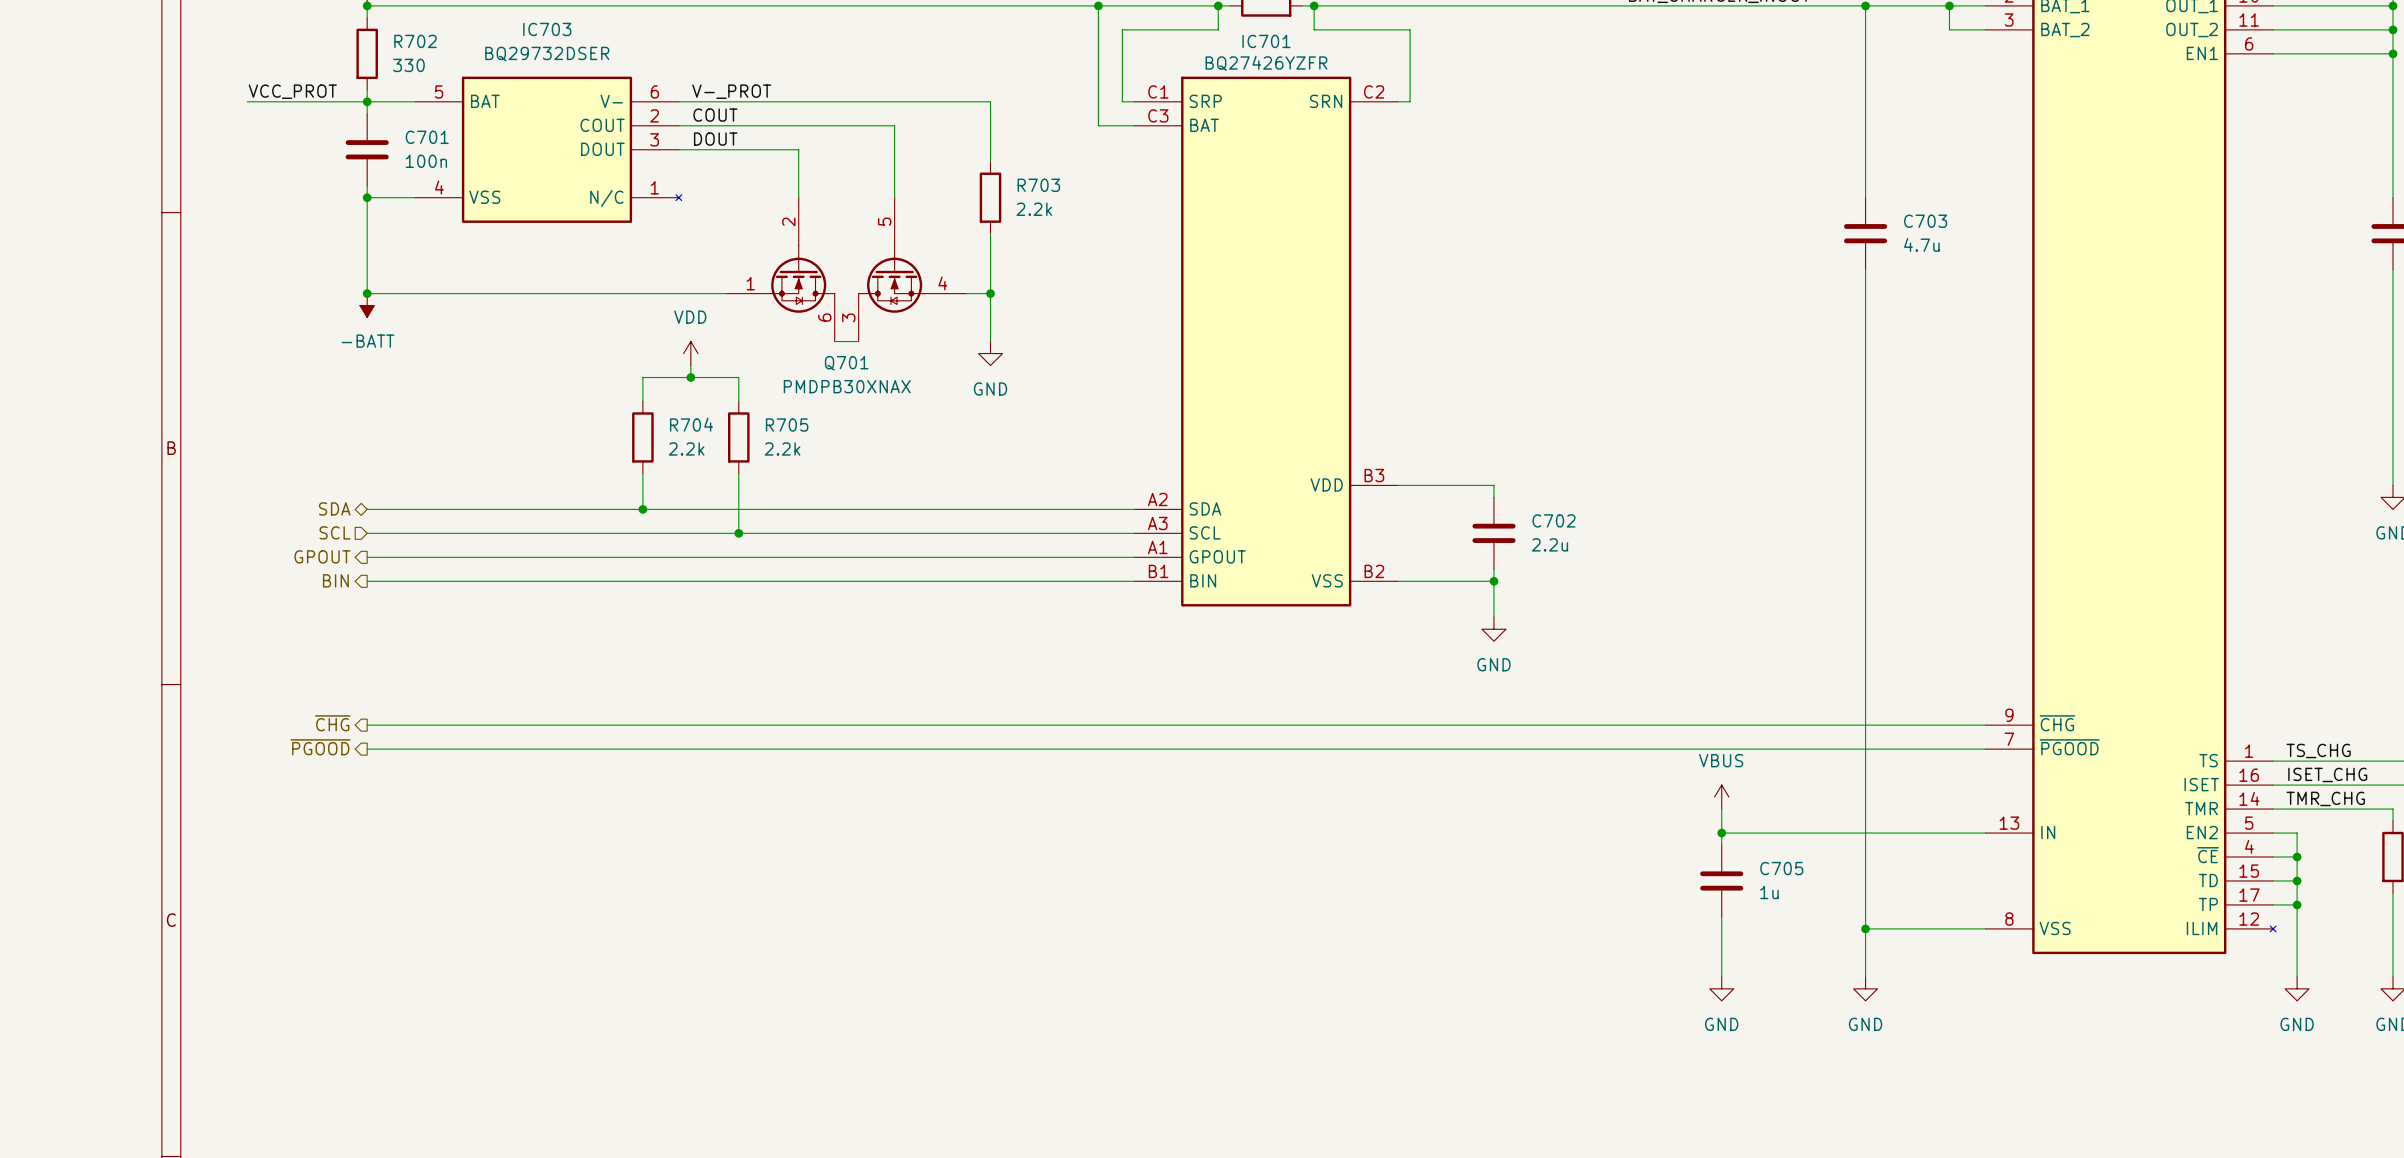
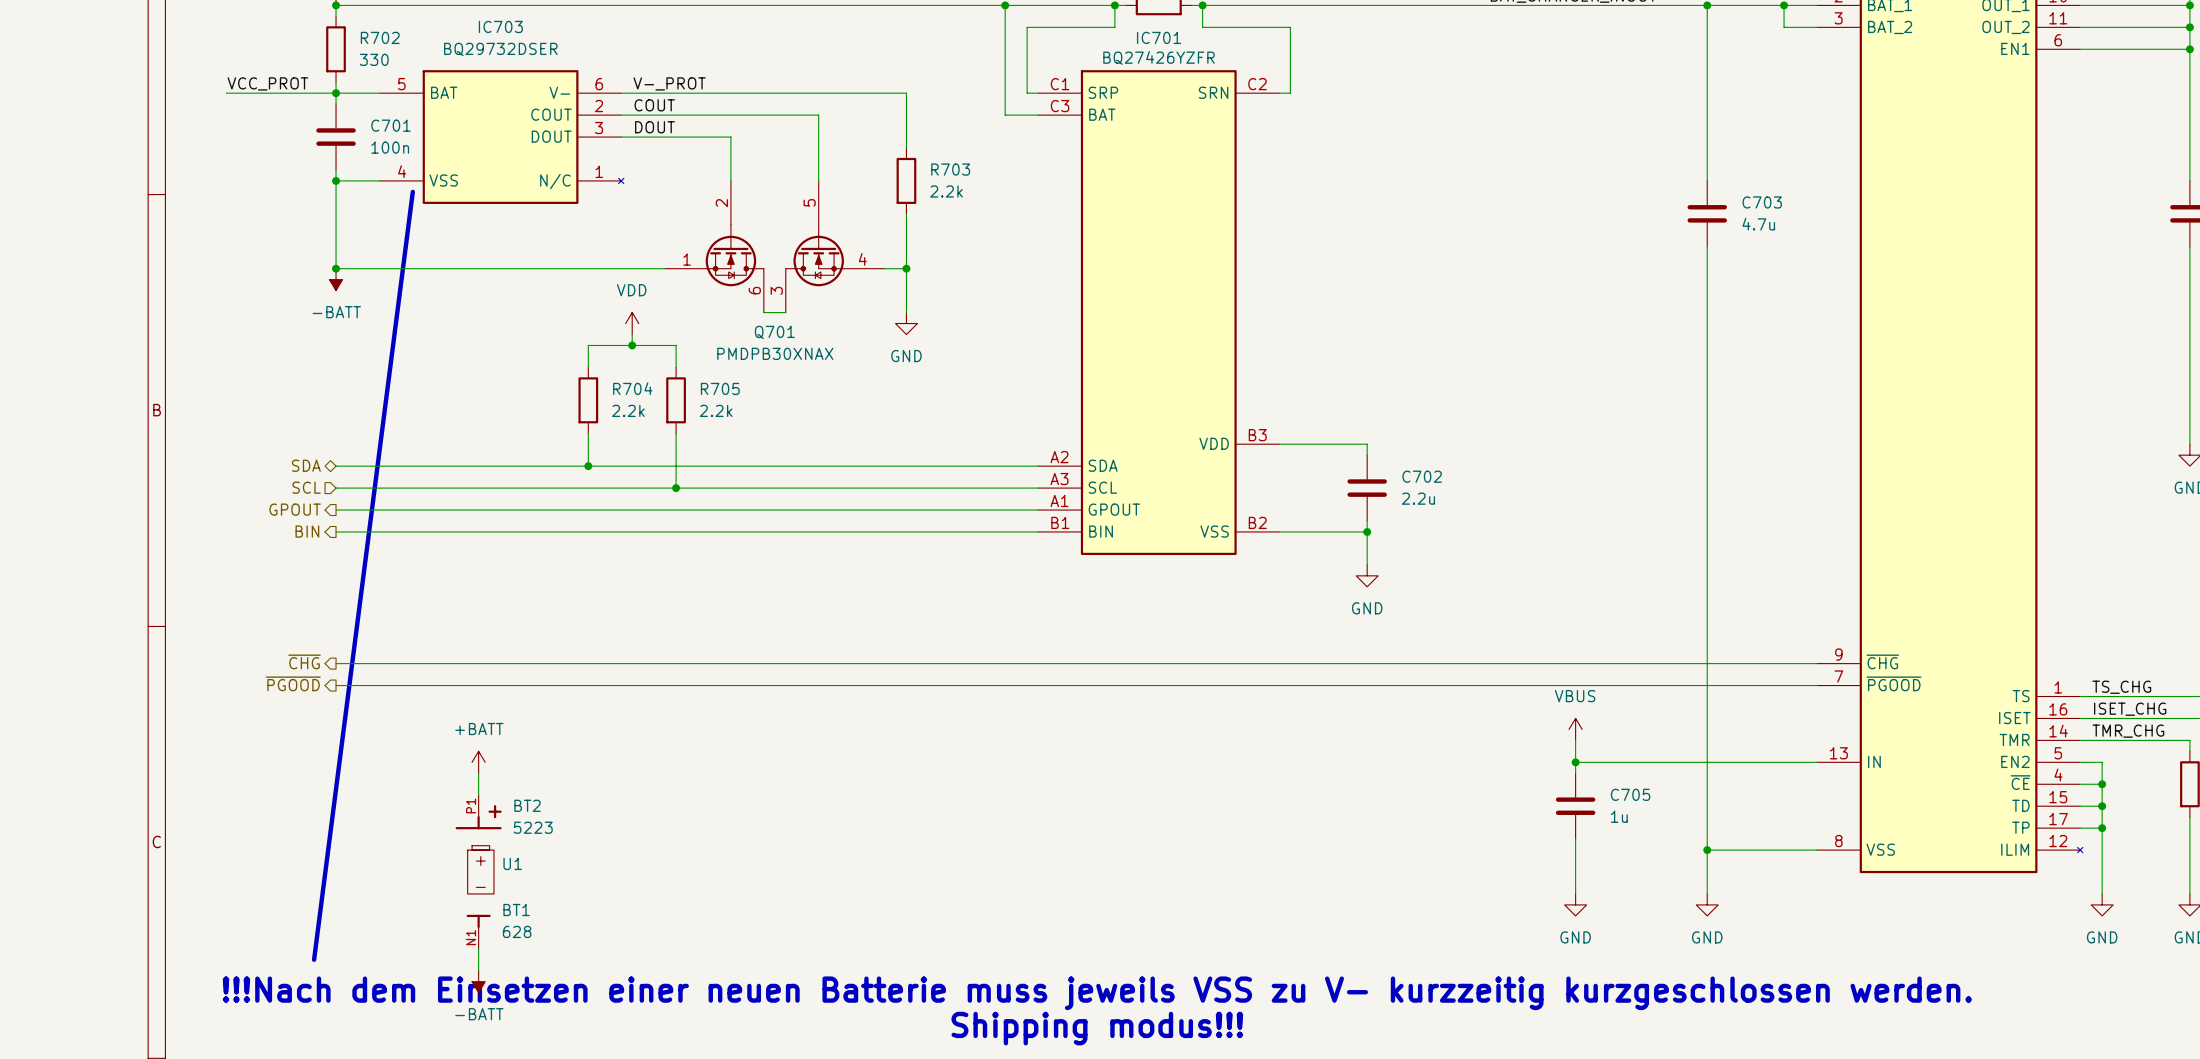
line: none -> (412, 191) (314, 959)
power symbol: none -> +BATT (478, 762)
wire: none -> (478, 773) (478, 795)
BT2: none -> 5223 (478, 812)
U1: none -> (480, 869)
BT1: none -> 628 (478, 931)
wire: none -> (478, 948) (478, 970)
power symbol: none -> -BATT (478, 981)
text: none -> !!!Nach dem Einsetzen einer neuen Batterie muss jeweils VSS zu V- kurzzeitig kurzgeschlossen werden. (1097, 993)
text: none -> Shipping modus!!! (1097, 1028)

